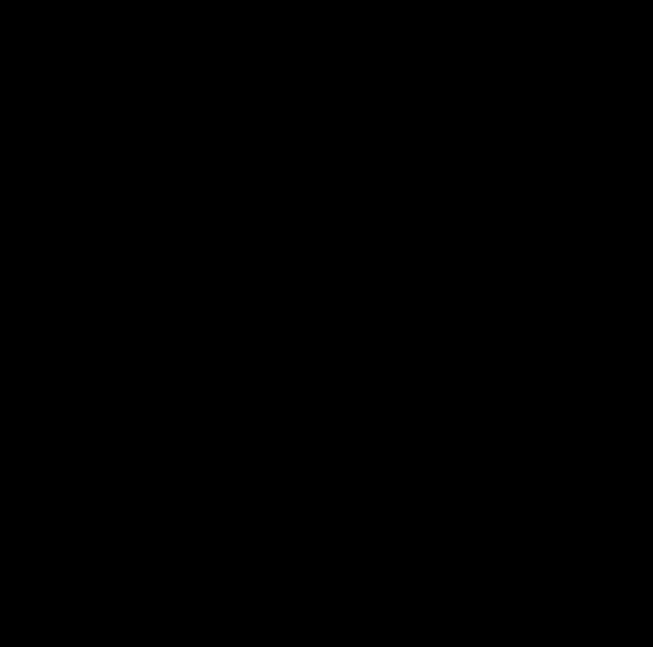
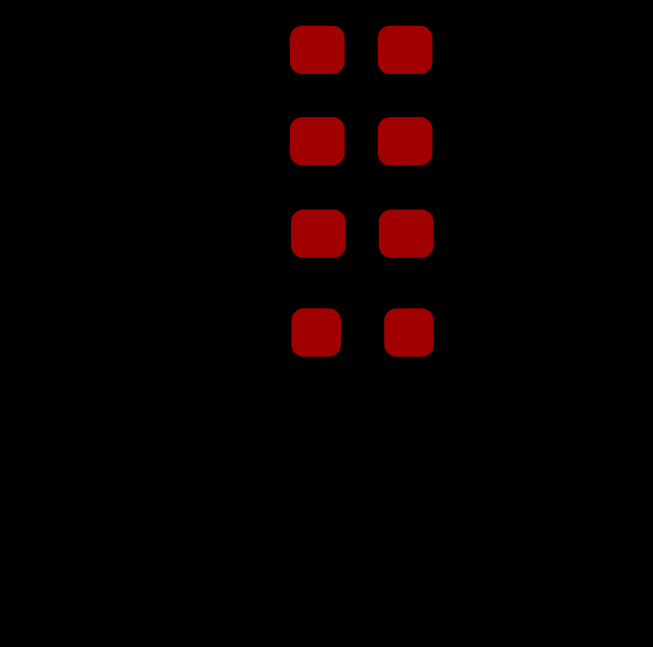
part: none -> (361, 49)
part: none -> (361, 141)
part: none -> (362, 233)
part: none -> (362, 332)

